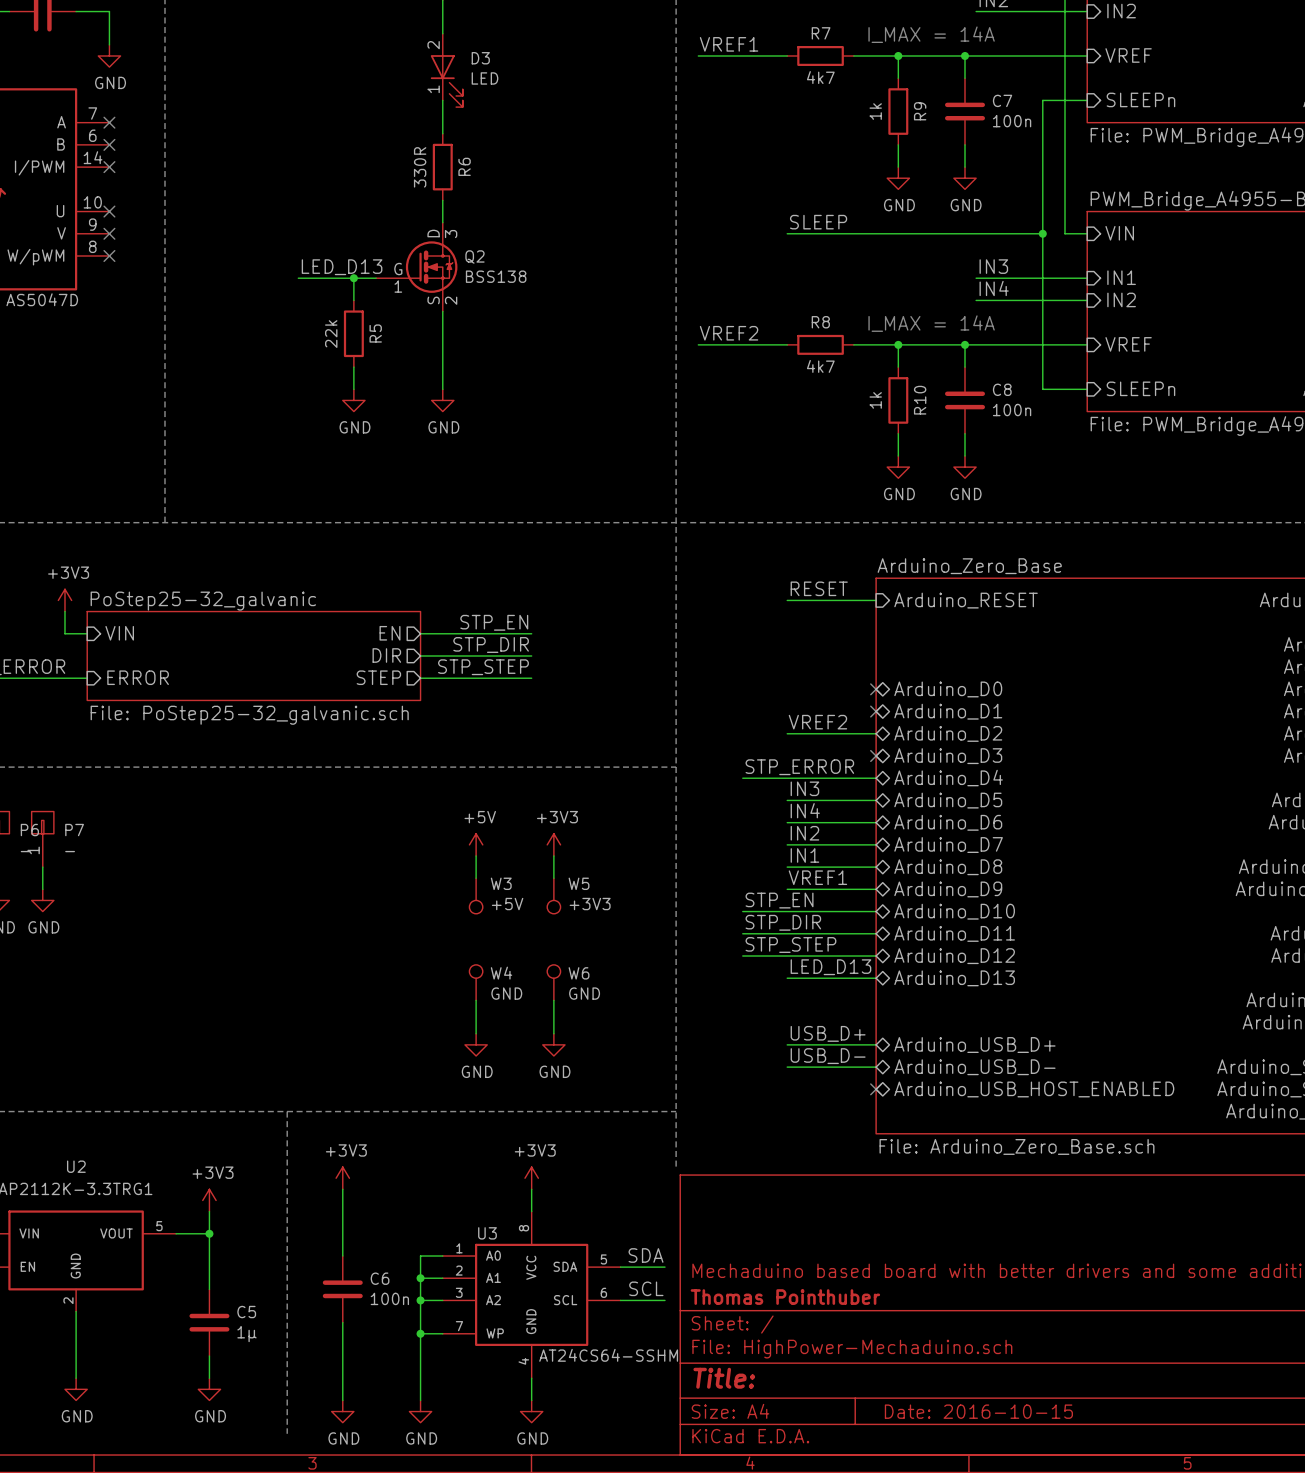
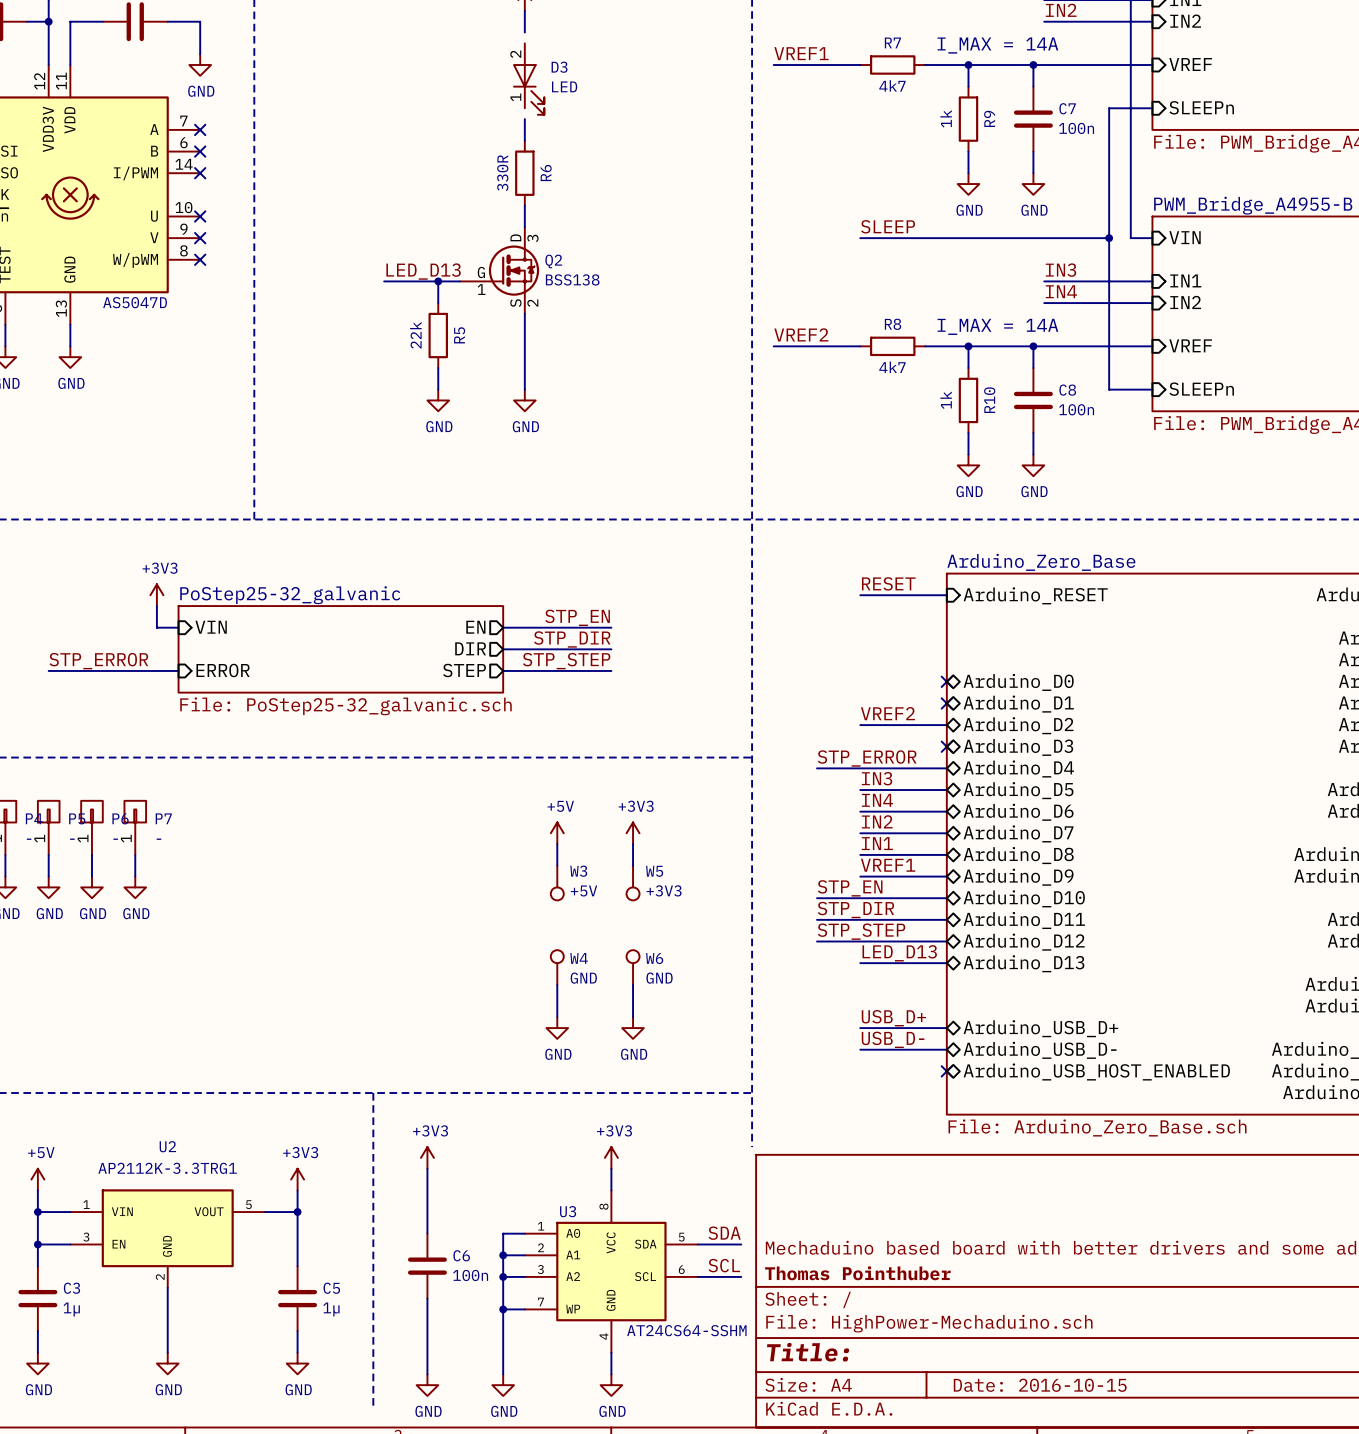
wire: (442, 22) (442, 33) -> none
wire: (442, 100) (442, 111) -> none

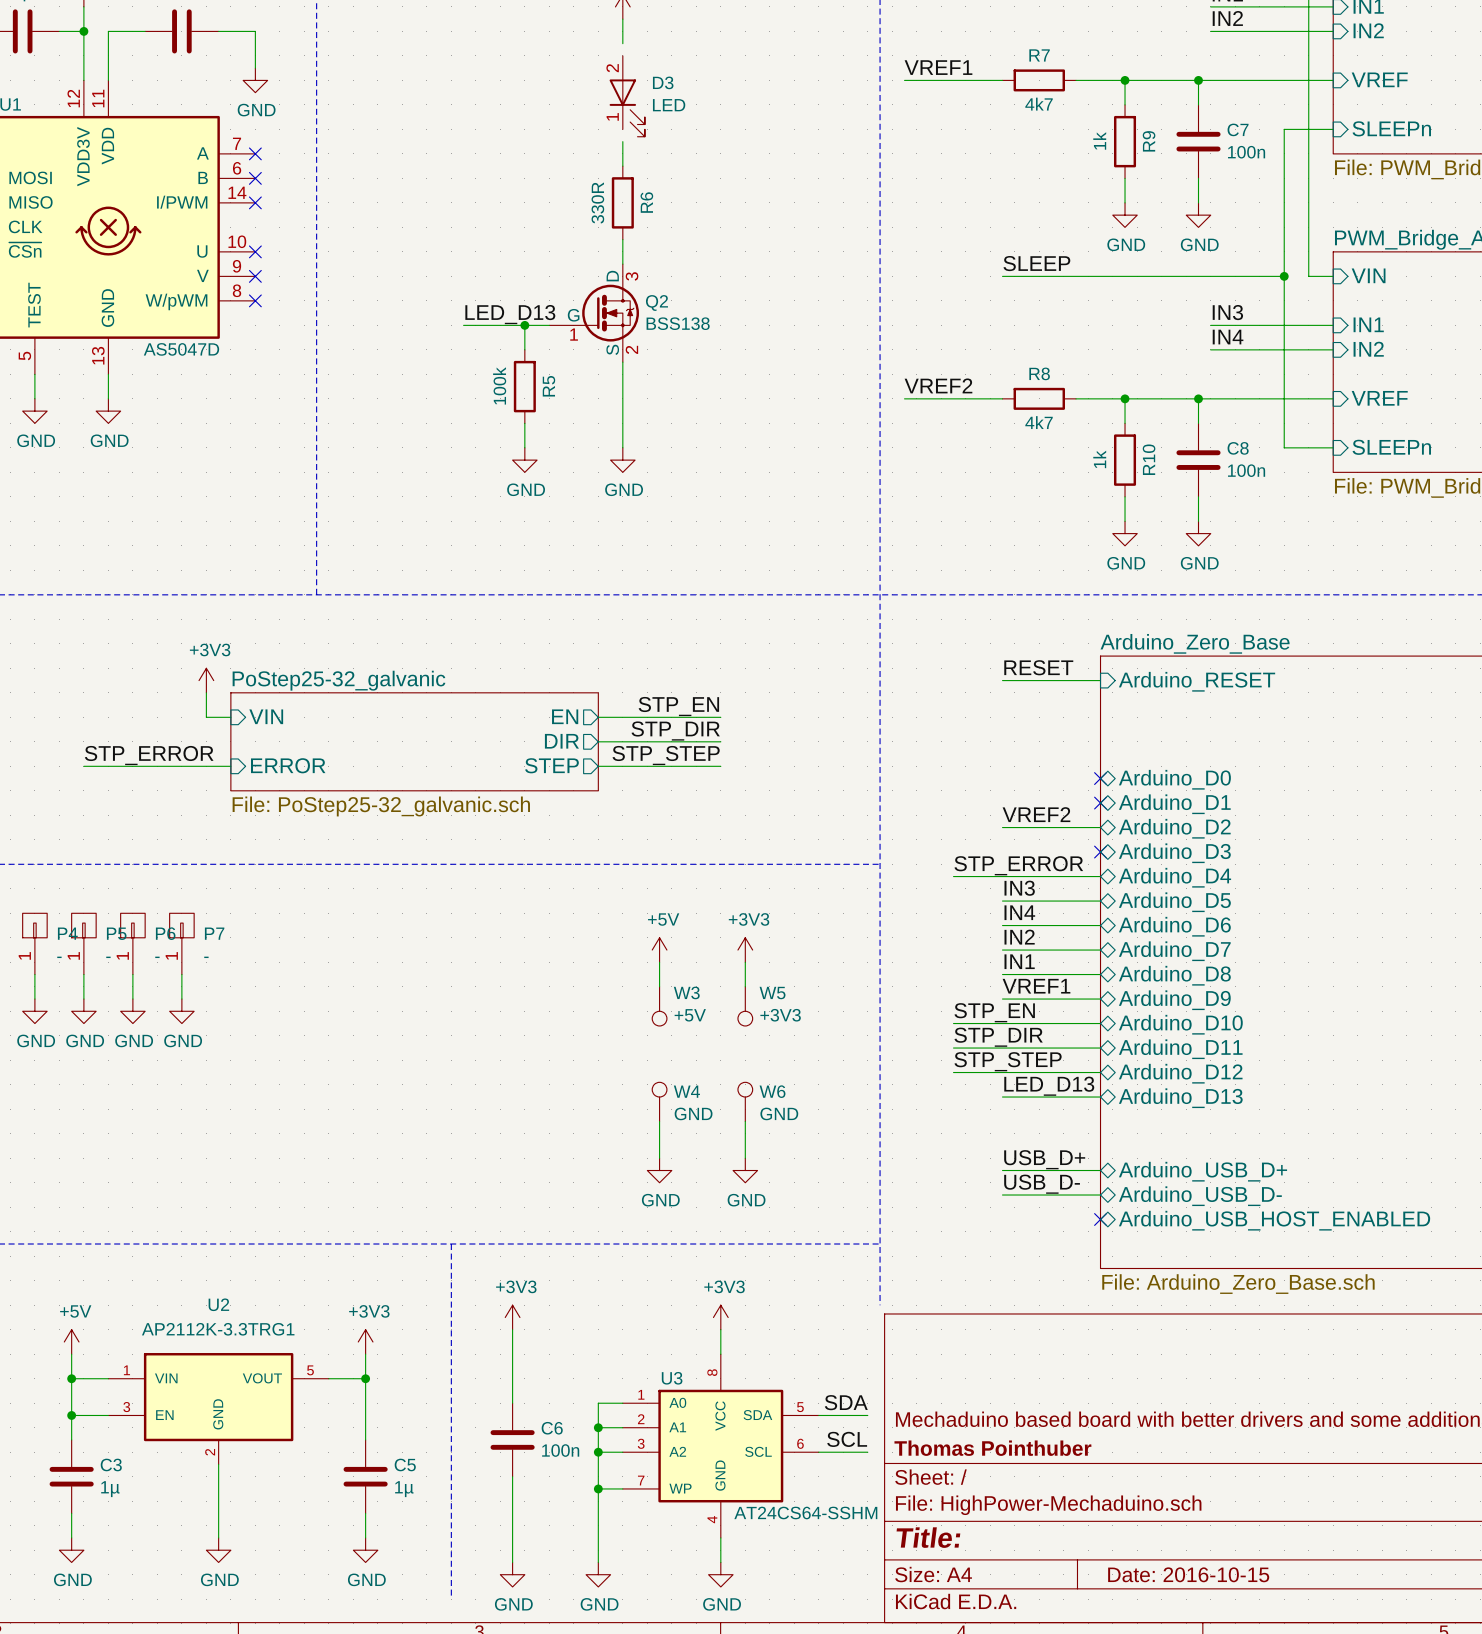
text: I_MAX = 14A (997, 45) -> none
text: I_MAX = 14A (997, 326) -> none
R5 value: 22k (415, 335) -> 100k (499, 385)

